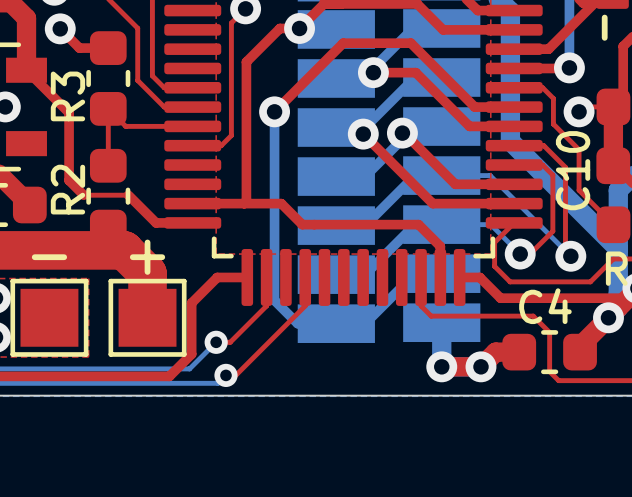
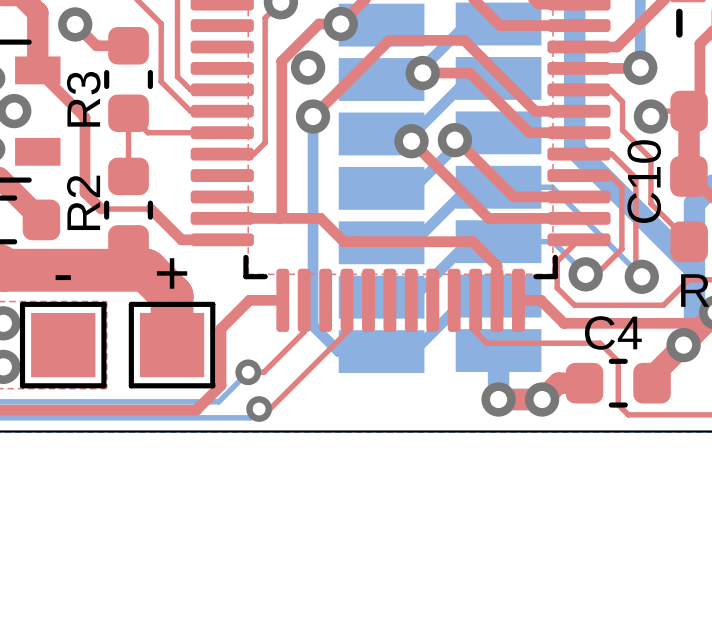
via: none -> (308, 67)

